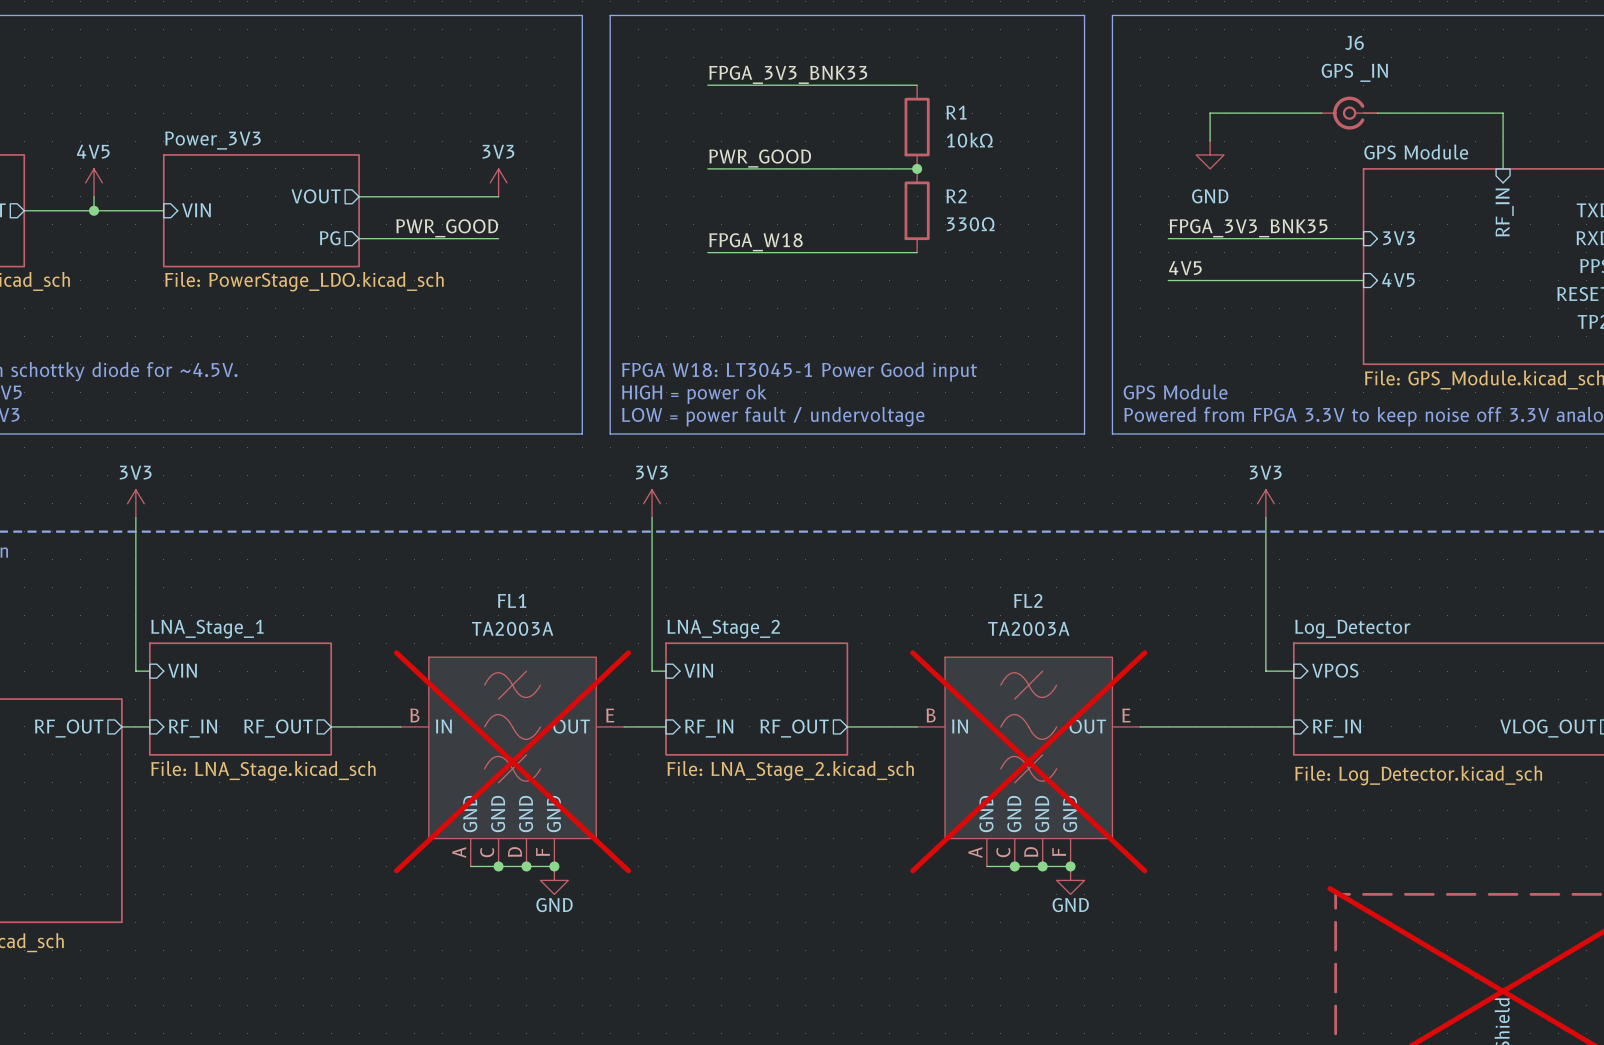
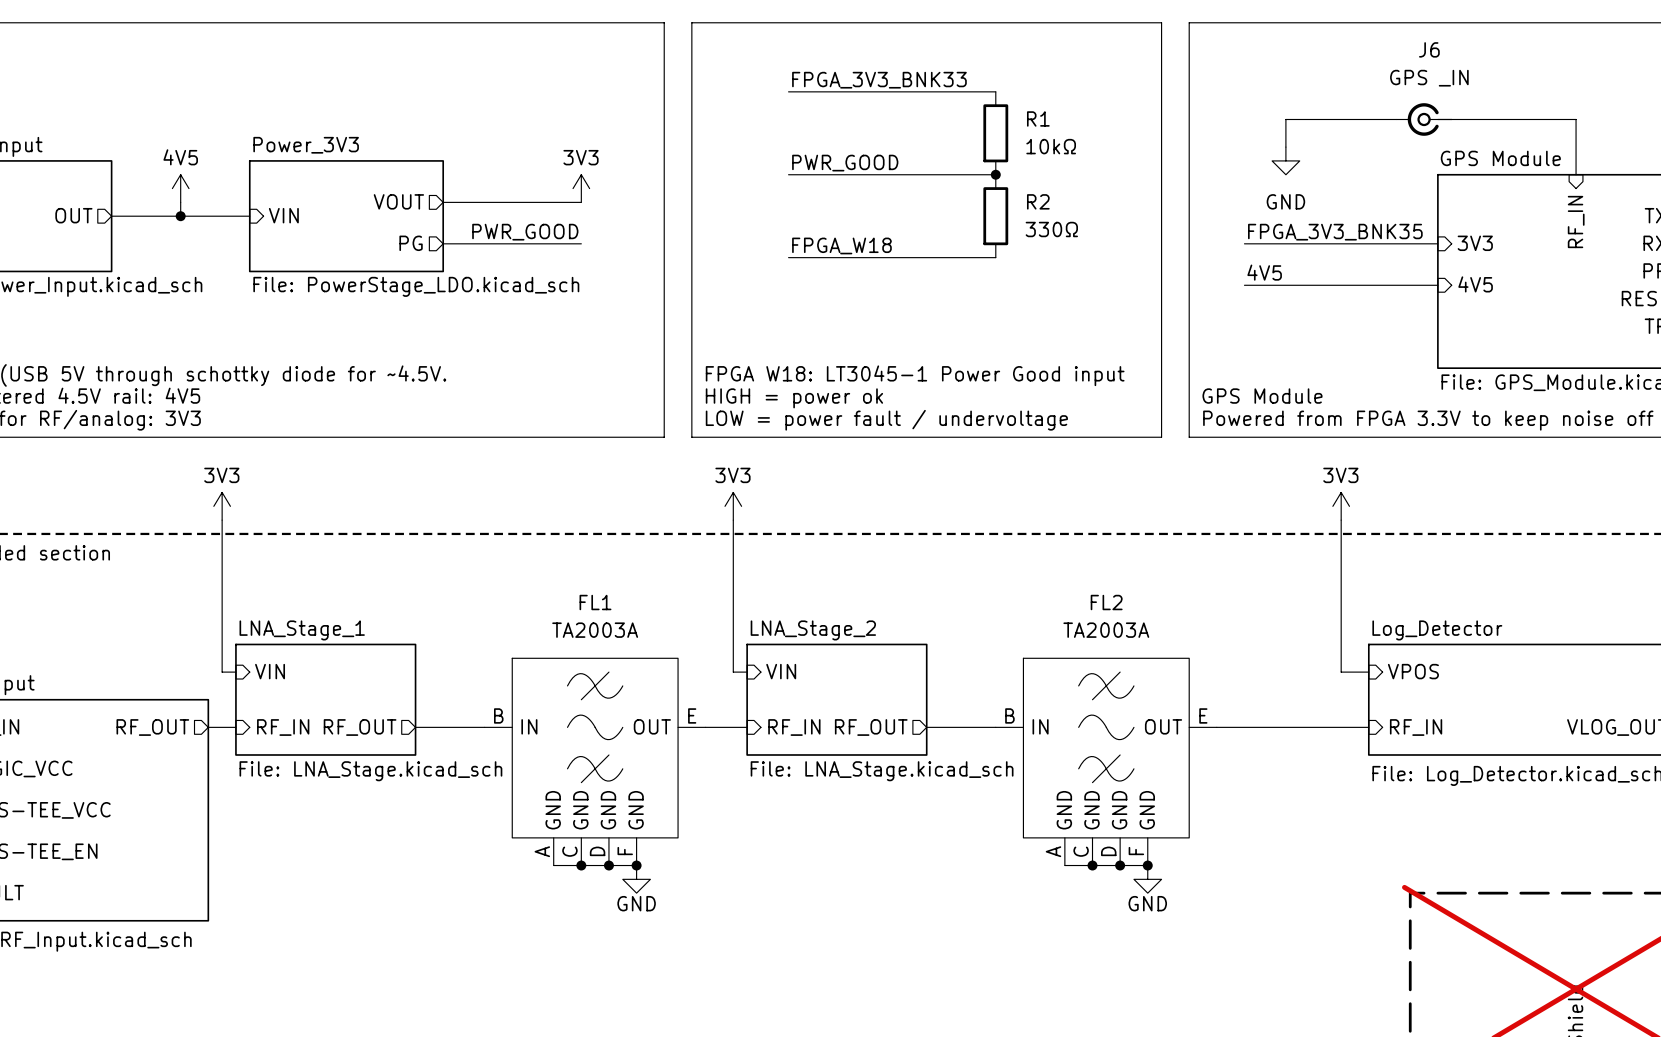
FL1 do-not-place cross: (512, 761) -> none
FL2 do-not-place cross: (1028, 761) -> none
sheet LNA_Stage_2 value: File: LNA_Stage_2.kicad_sch (790, 770) -> File: LNA_Stage.kicad_sch (882, 771)

